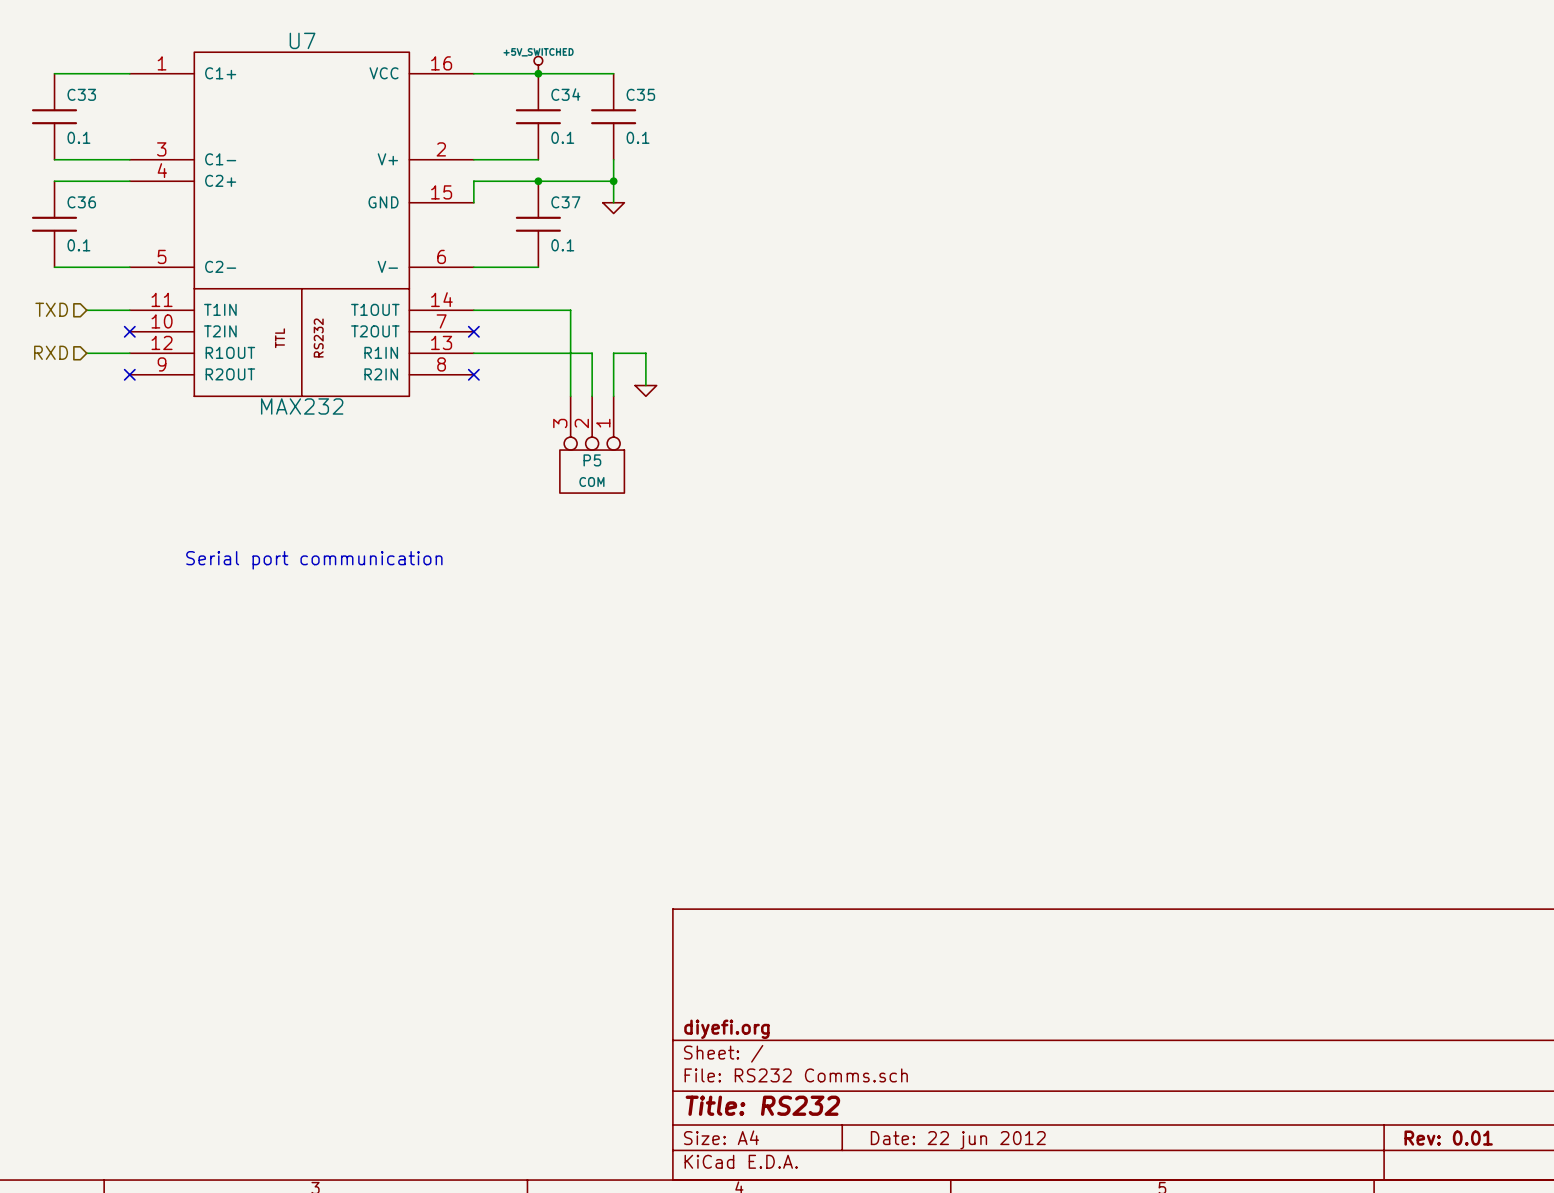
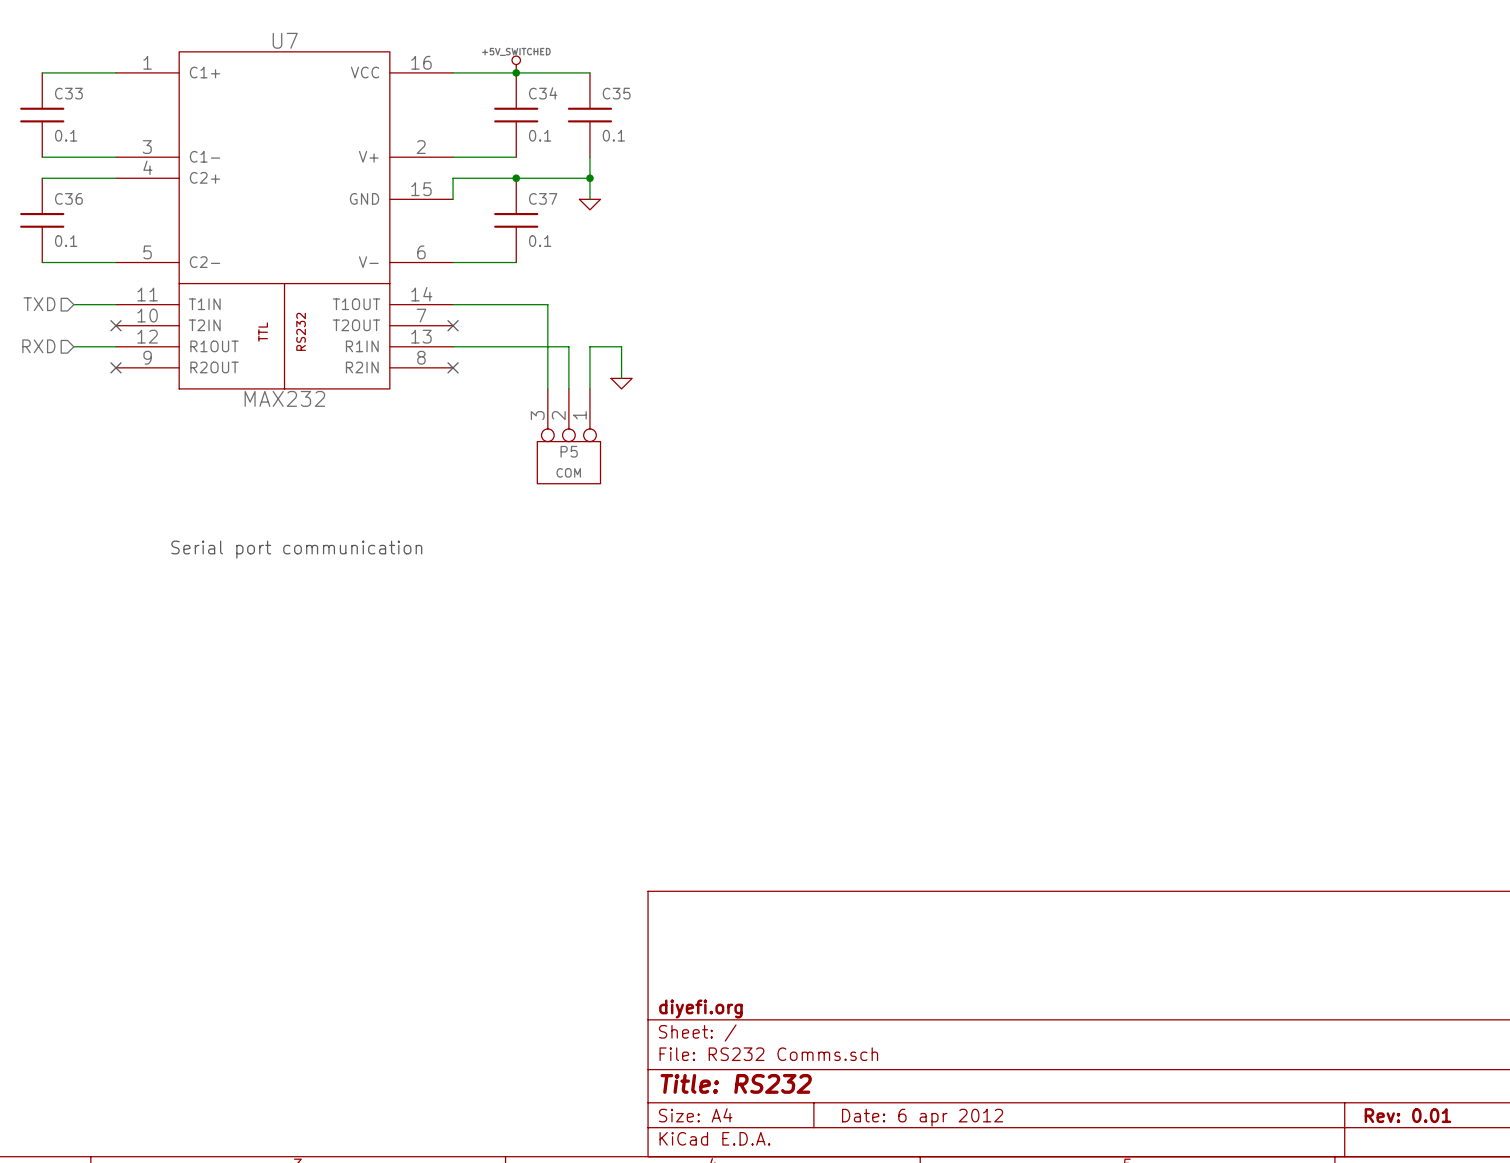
title block: Date: 22 jun 2012 (958, 1140) -> Date: 6 apr 2012 (922, 1117)

